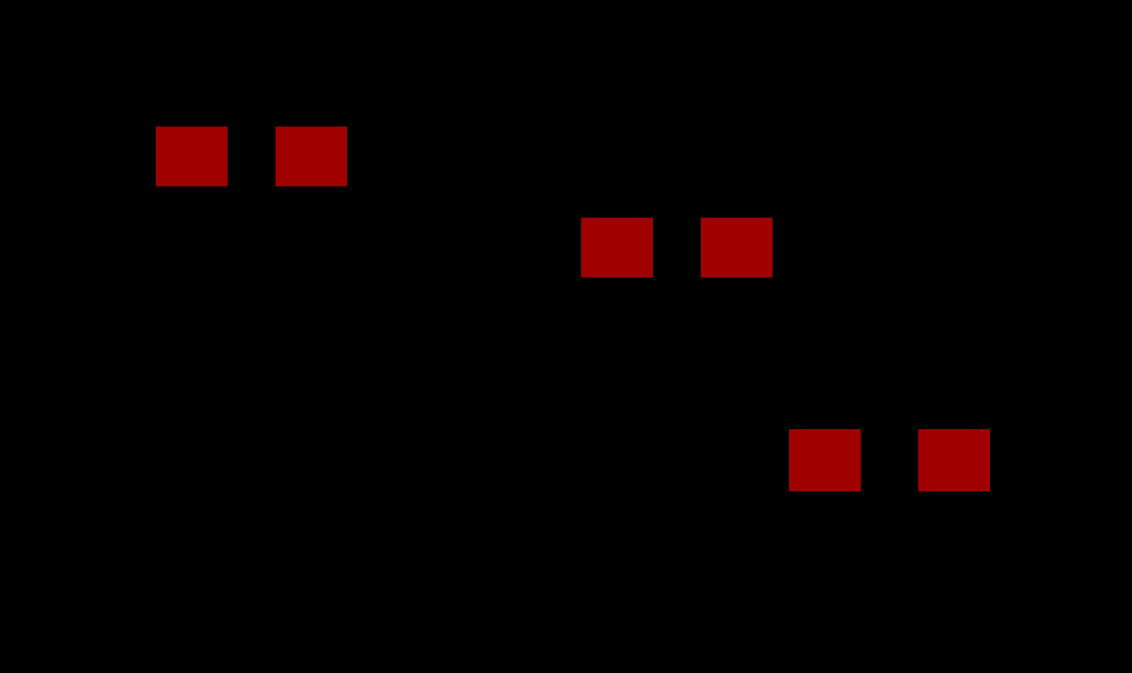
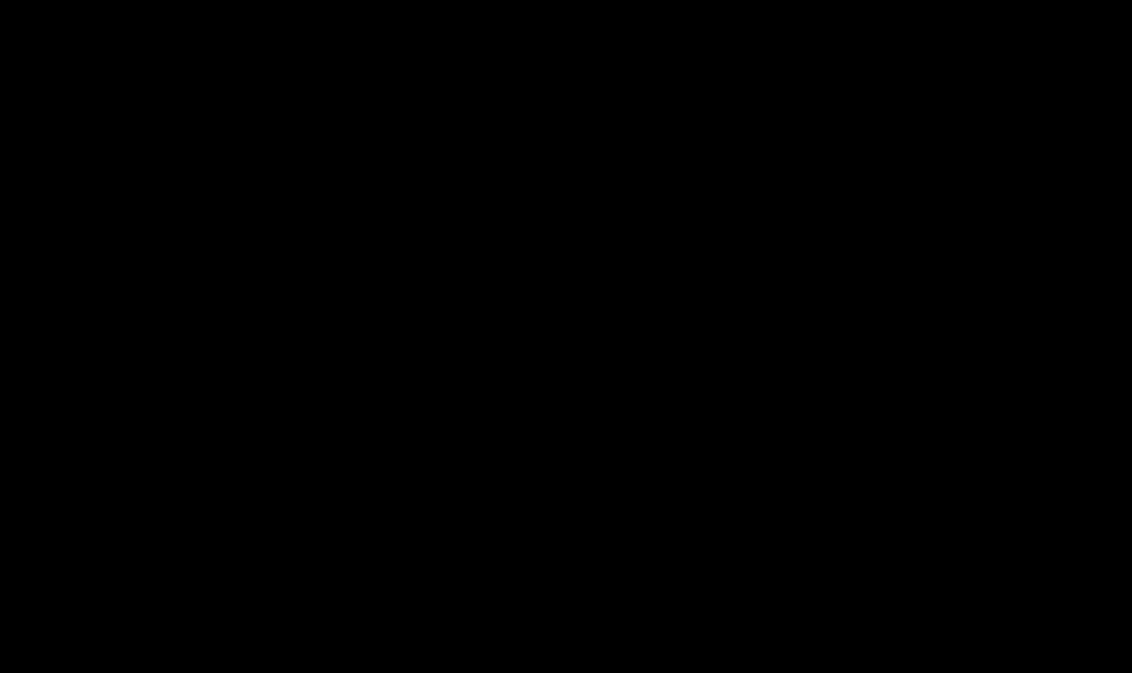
part: (251, 156) -> none
part: (676, 247) -> none
part: (889, 460) -> none

